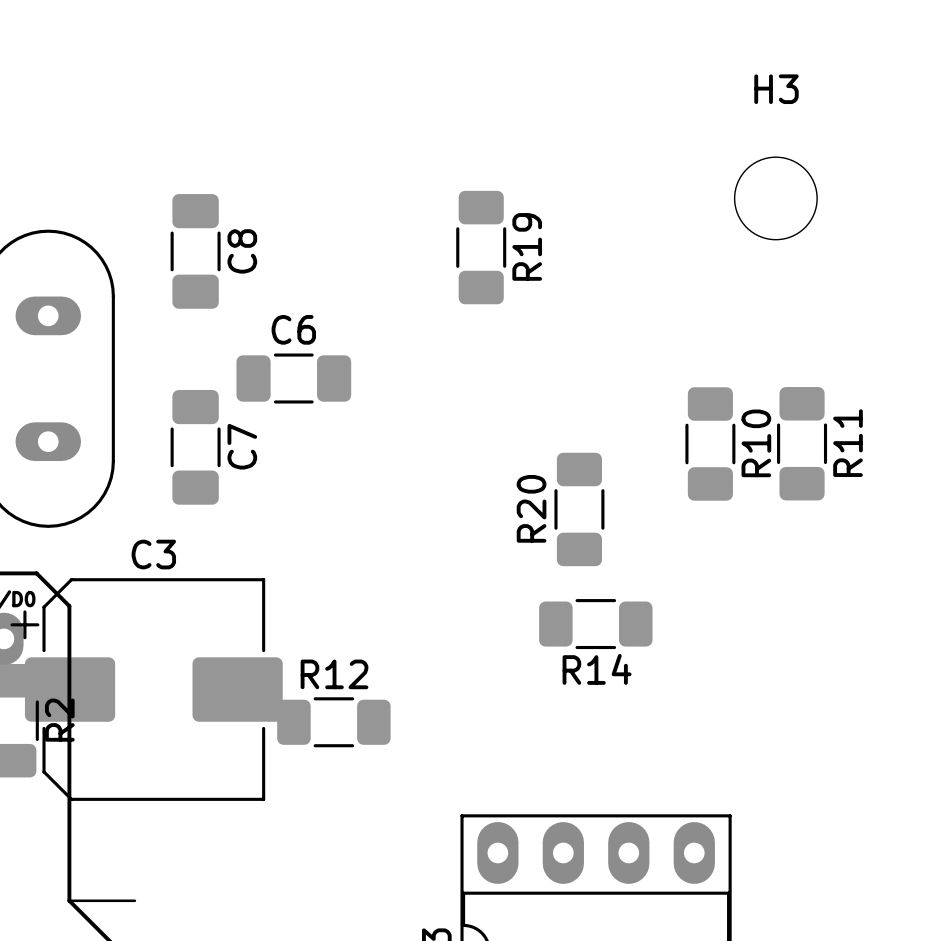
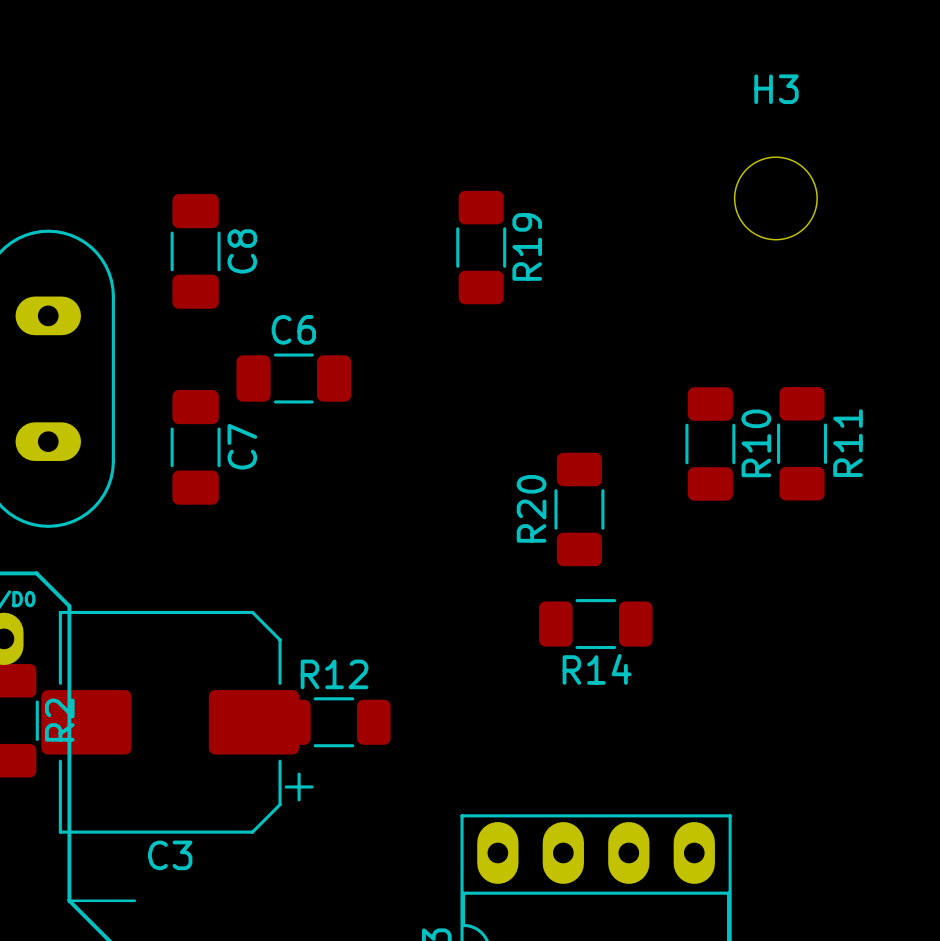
C3 rotation: 0° (146, 689) -> 180° (177, 722)

